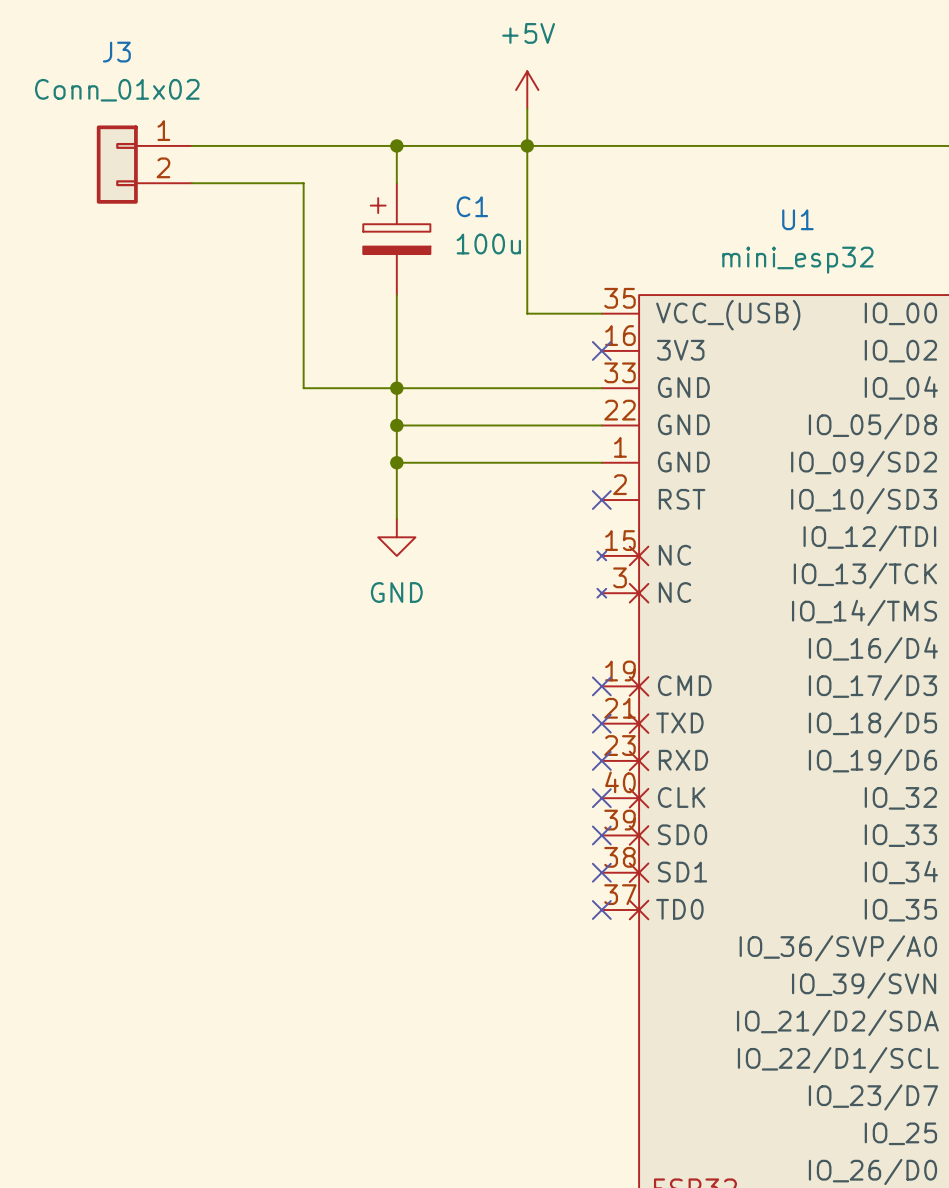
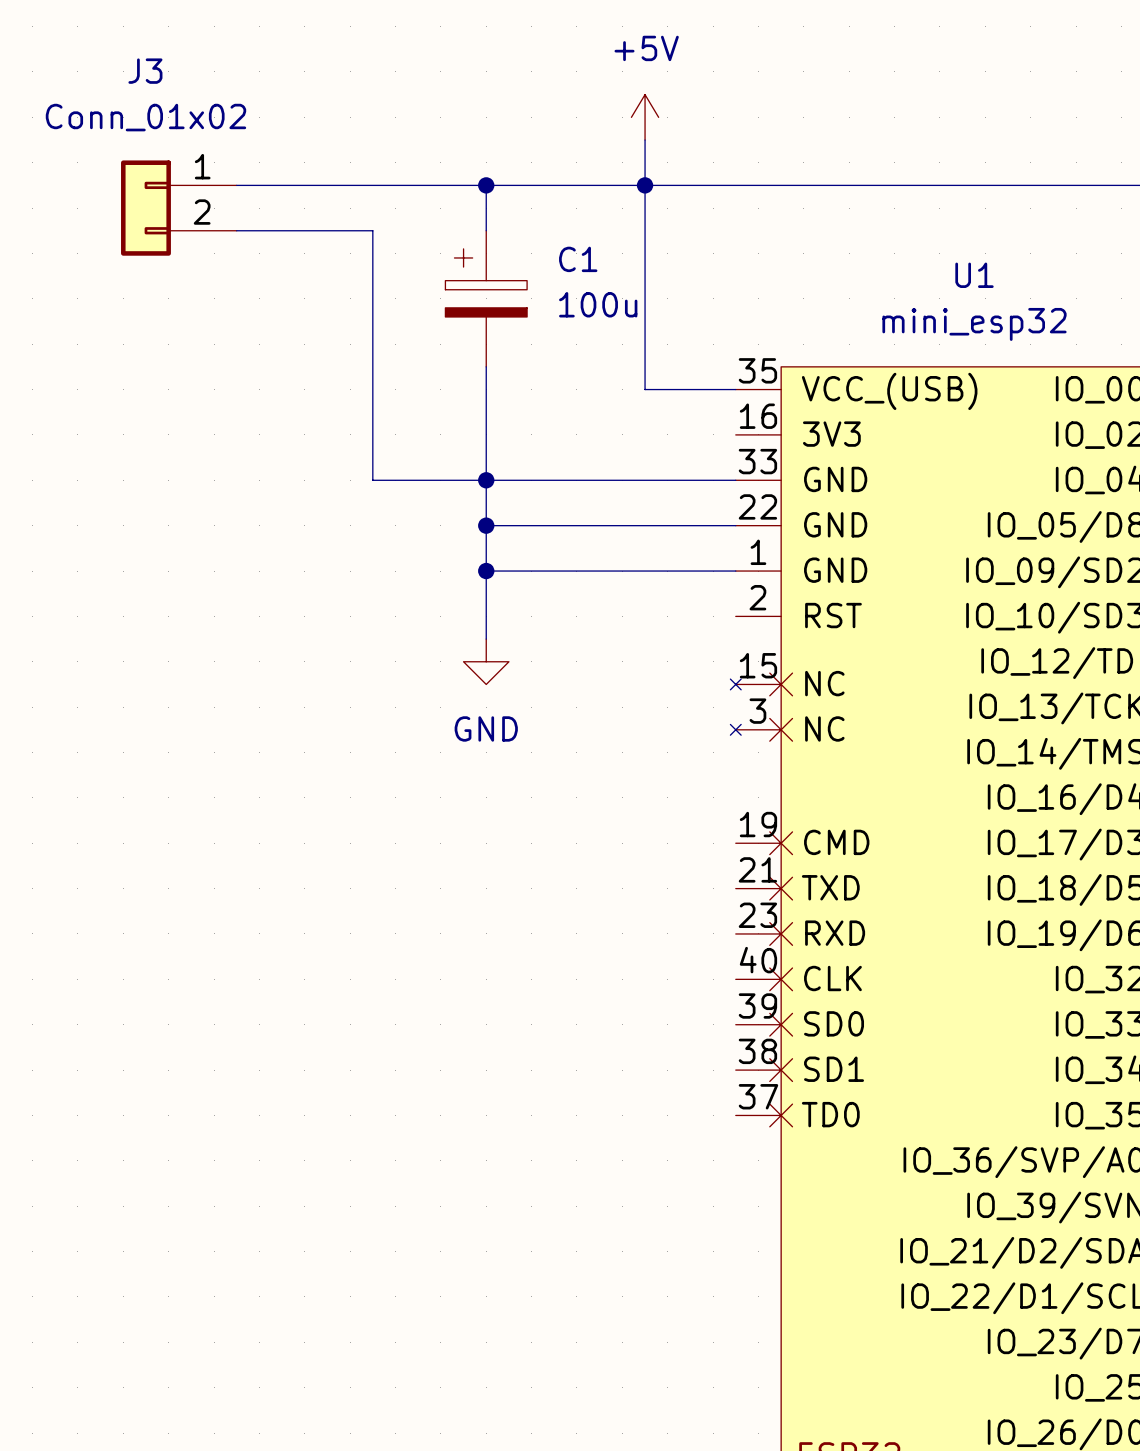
no-connect mark: (601, 350) -> none
no-connect mark: (601, 500) -> none
no-connect mark: (601, 686) -> none
no-connect mark: (601, 723) -> none
no-connect mark: (601, 760) -> none
no-connect mark: (601, 798) -> none
no-connect mark: (601, 835) -> none
no-connect mark: (601, 872) -> none
no-connect mark: (601, 910) -> none

